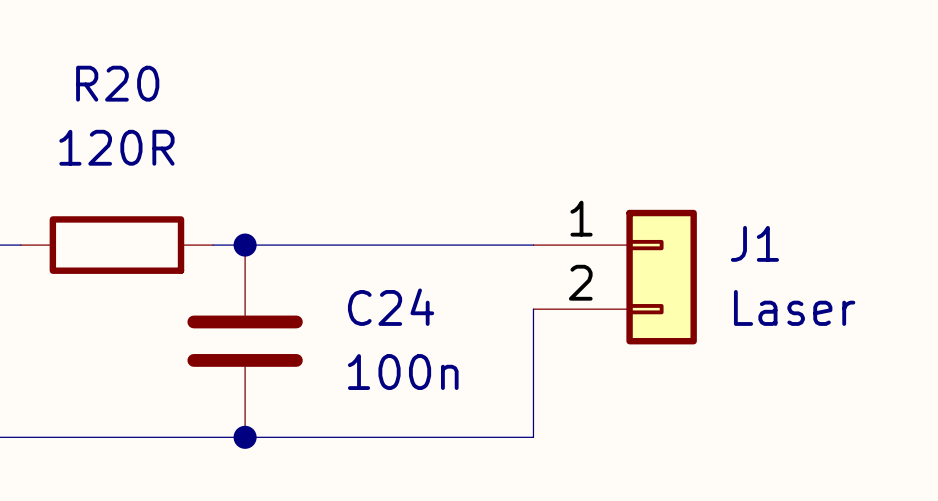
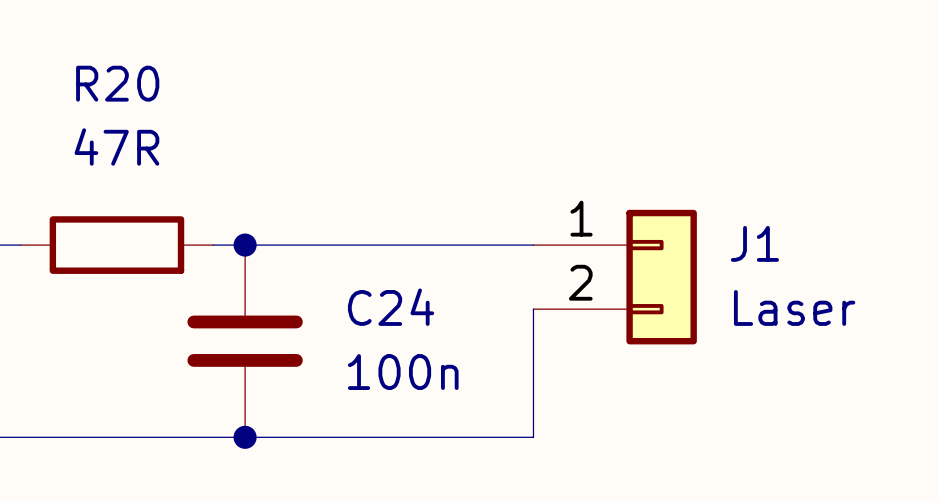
R20 value: 120R (116, 147) -> 47R (116, 146)

